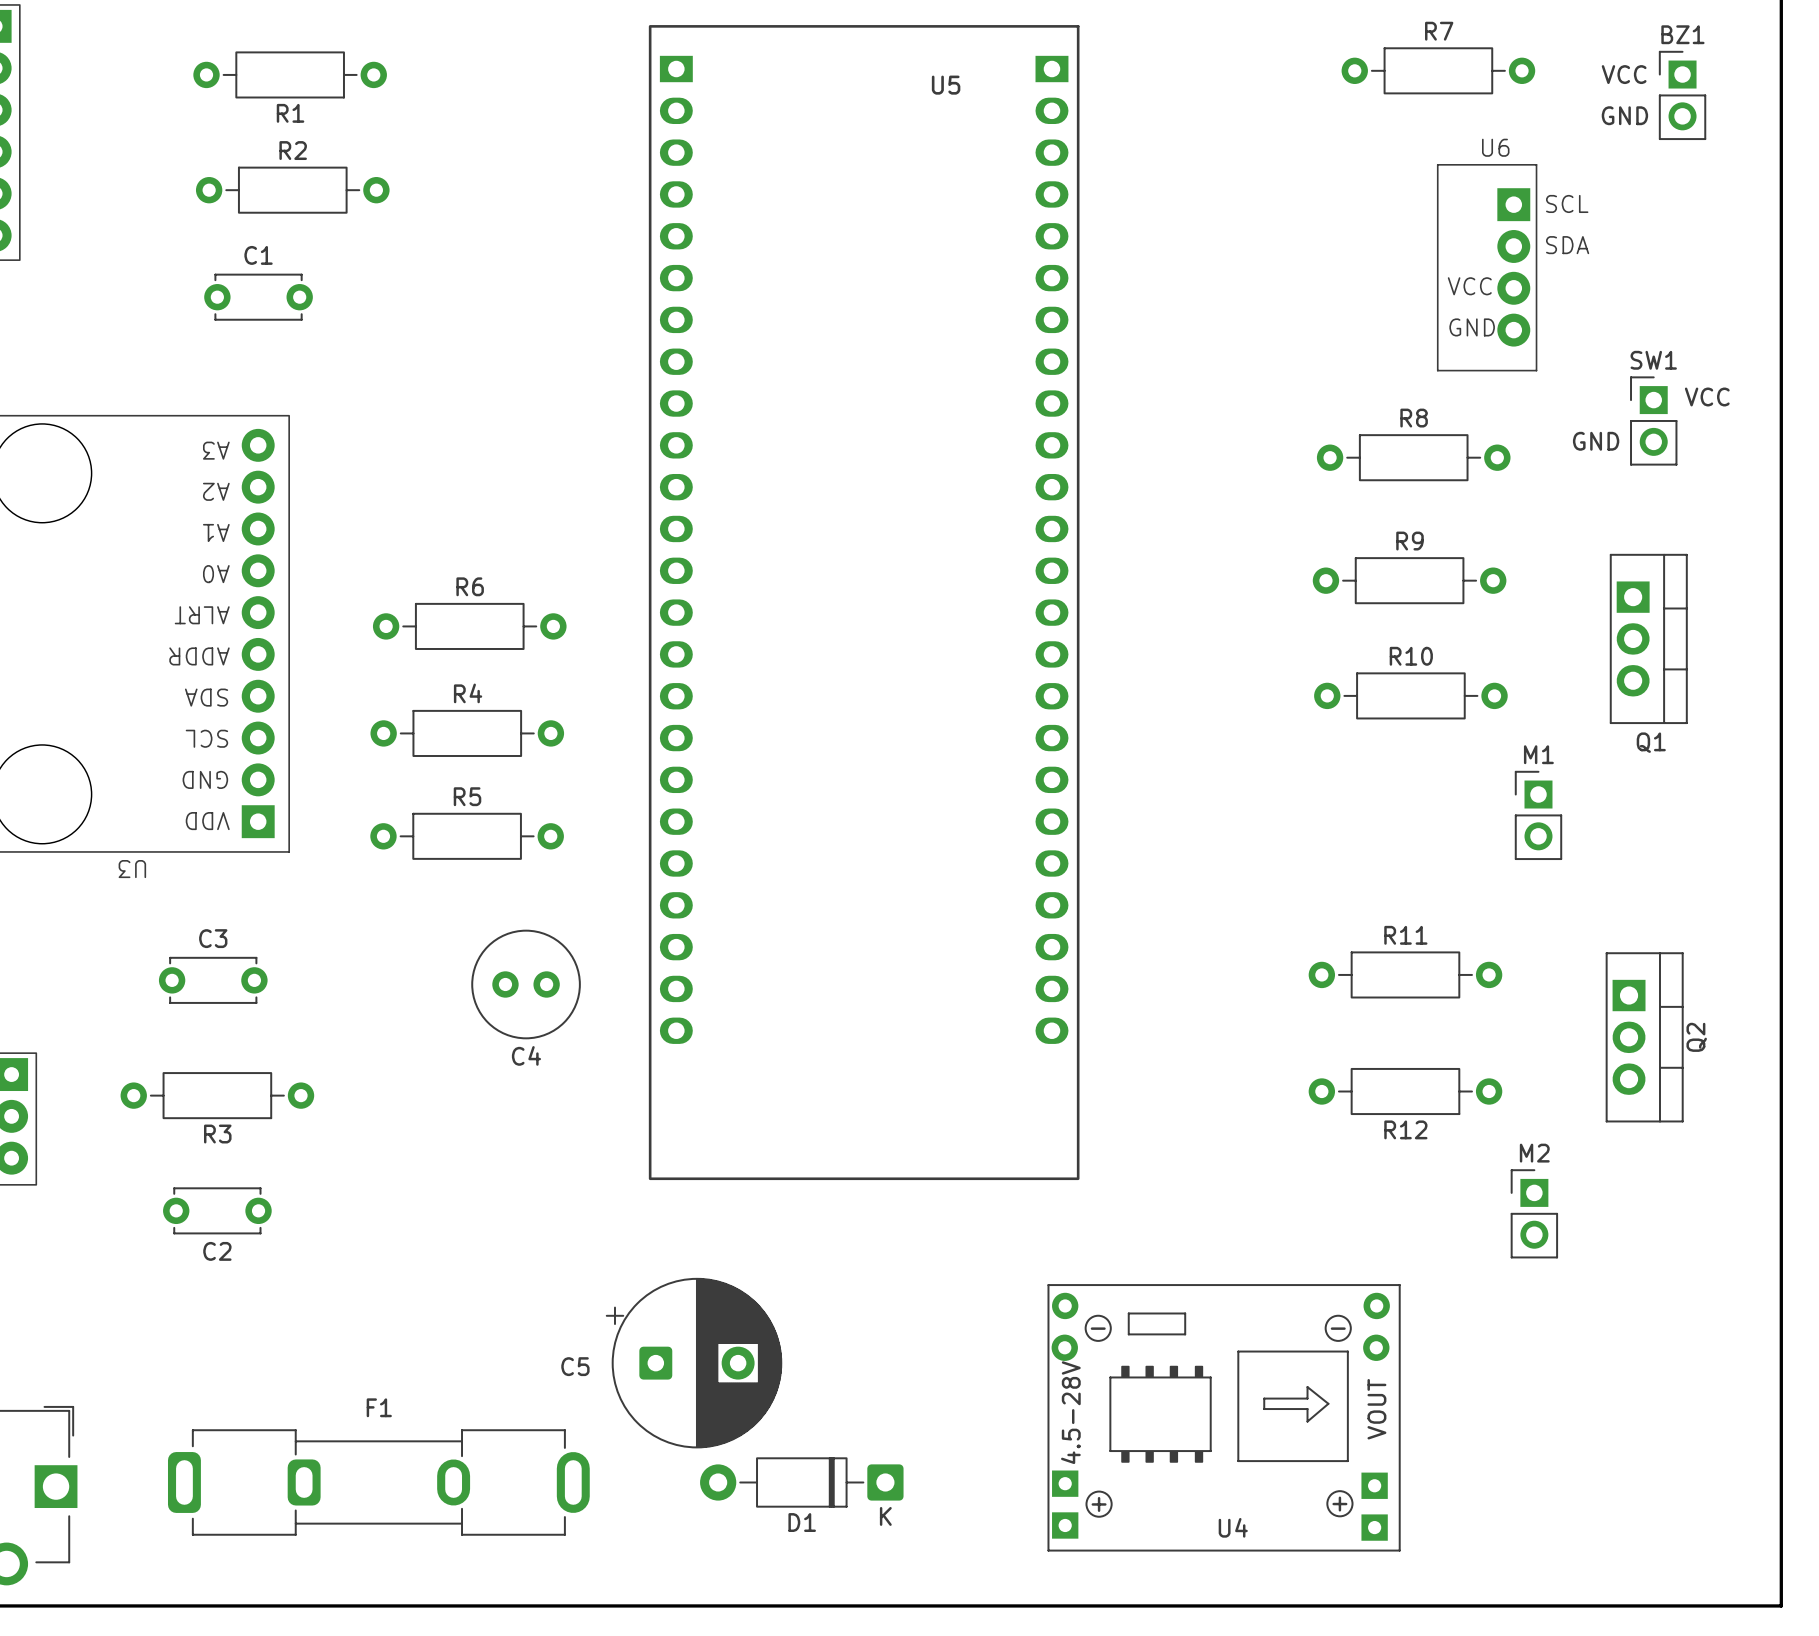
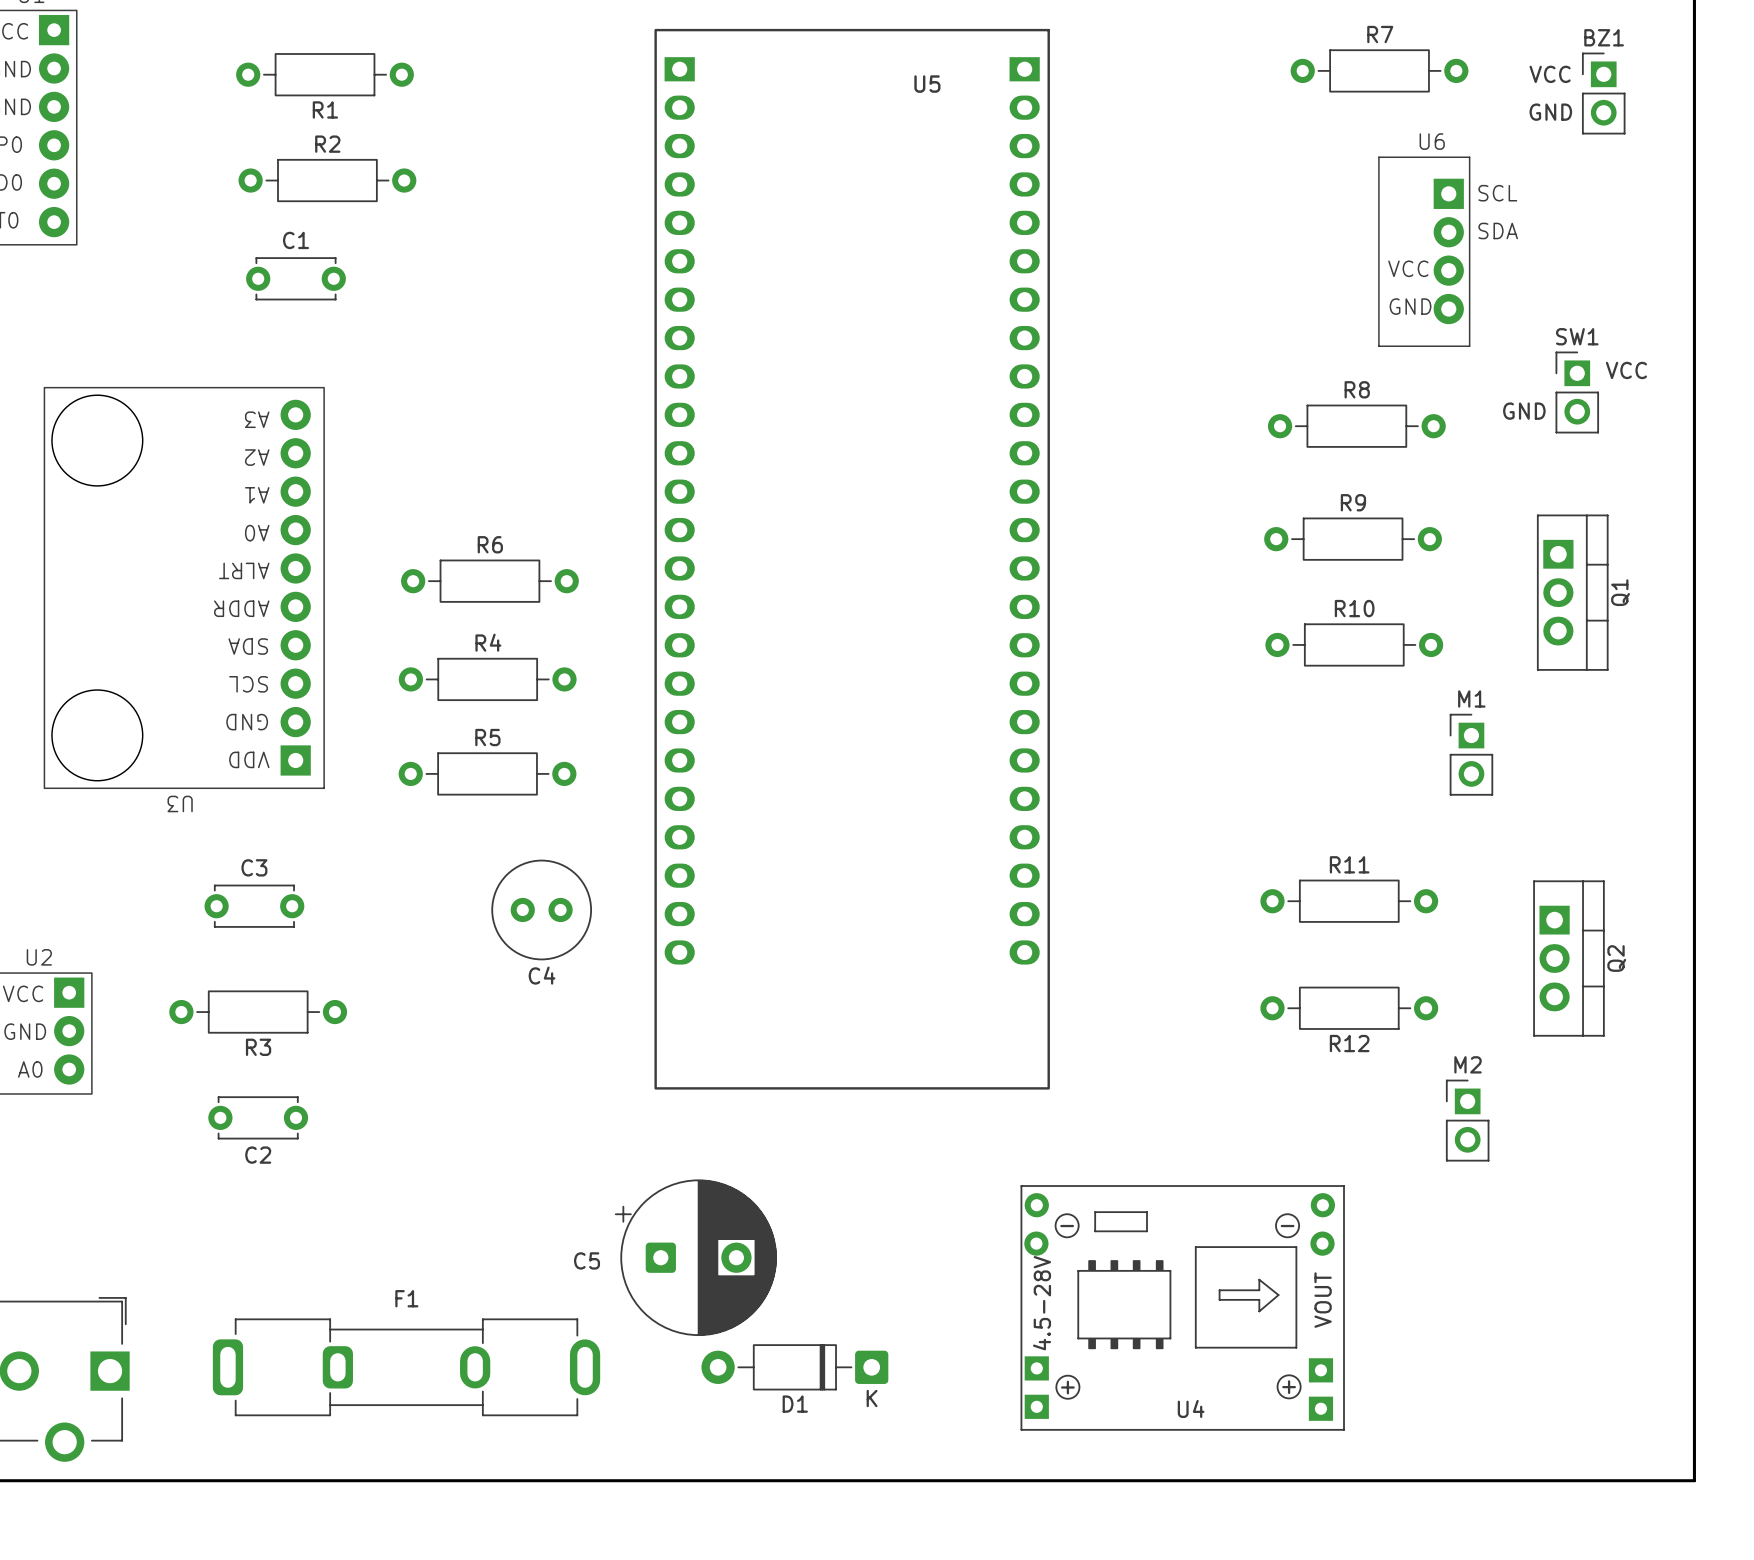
Q1 name rotation: 0° (1651, 742) -> 90° counterclockwise (1620, 592)
Q1 name position: Q1 (1651, 742) -> Q1 (1620, 592)

